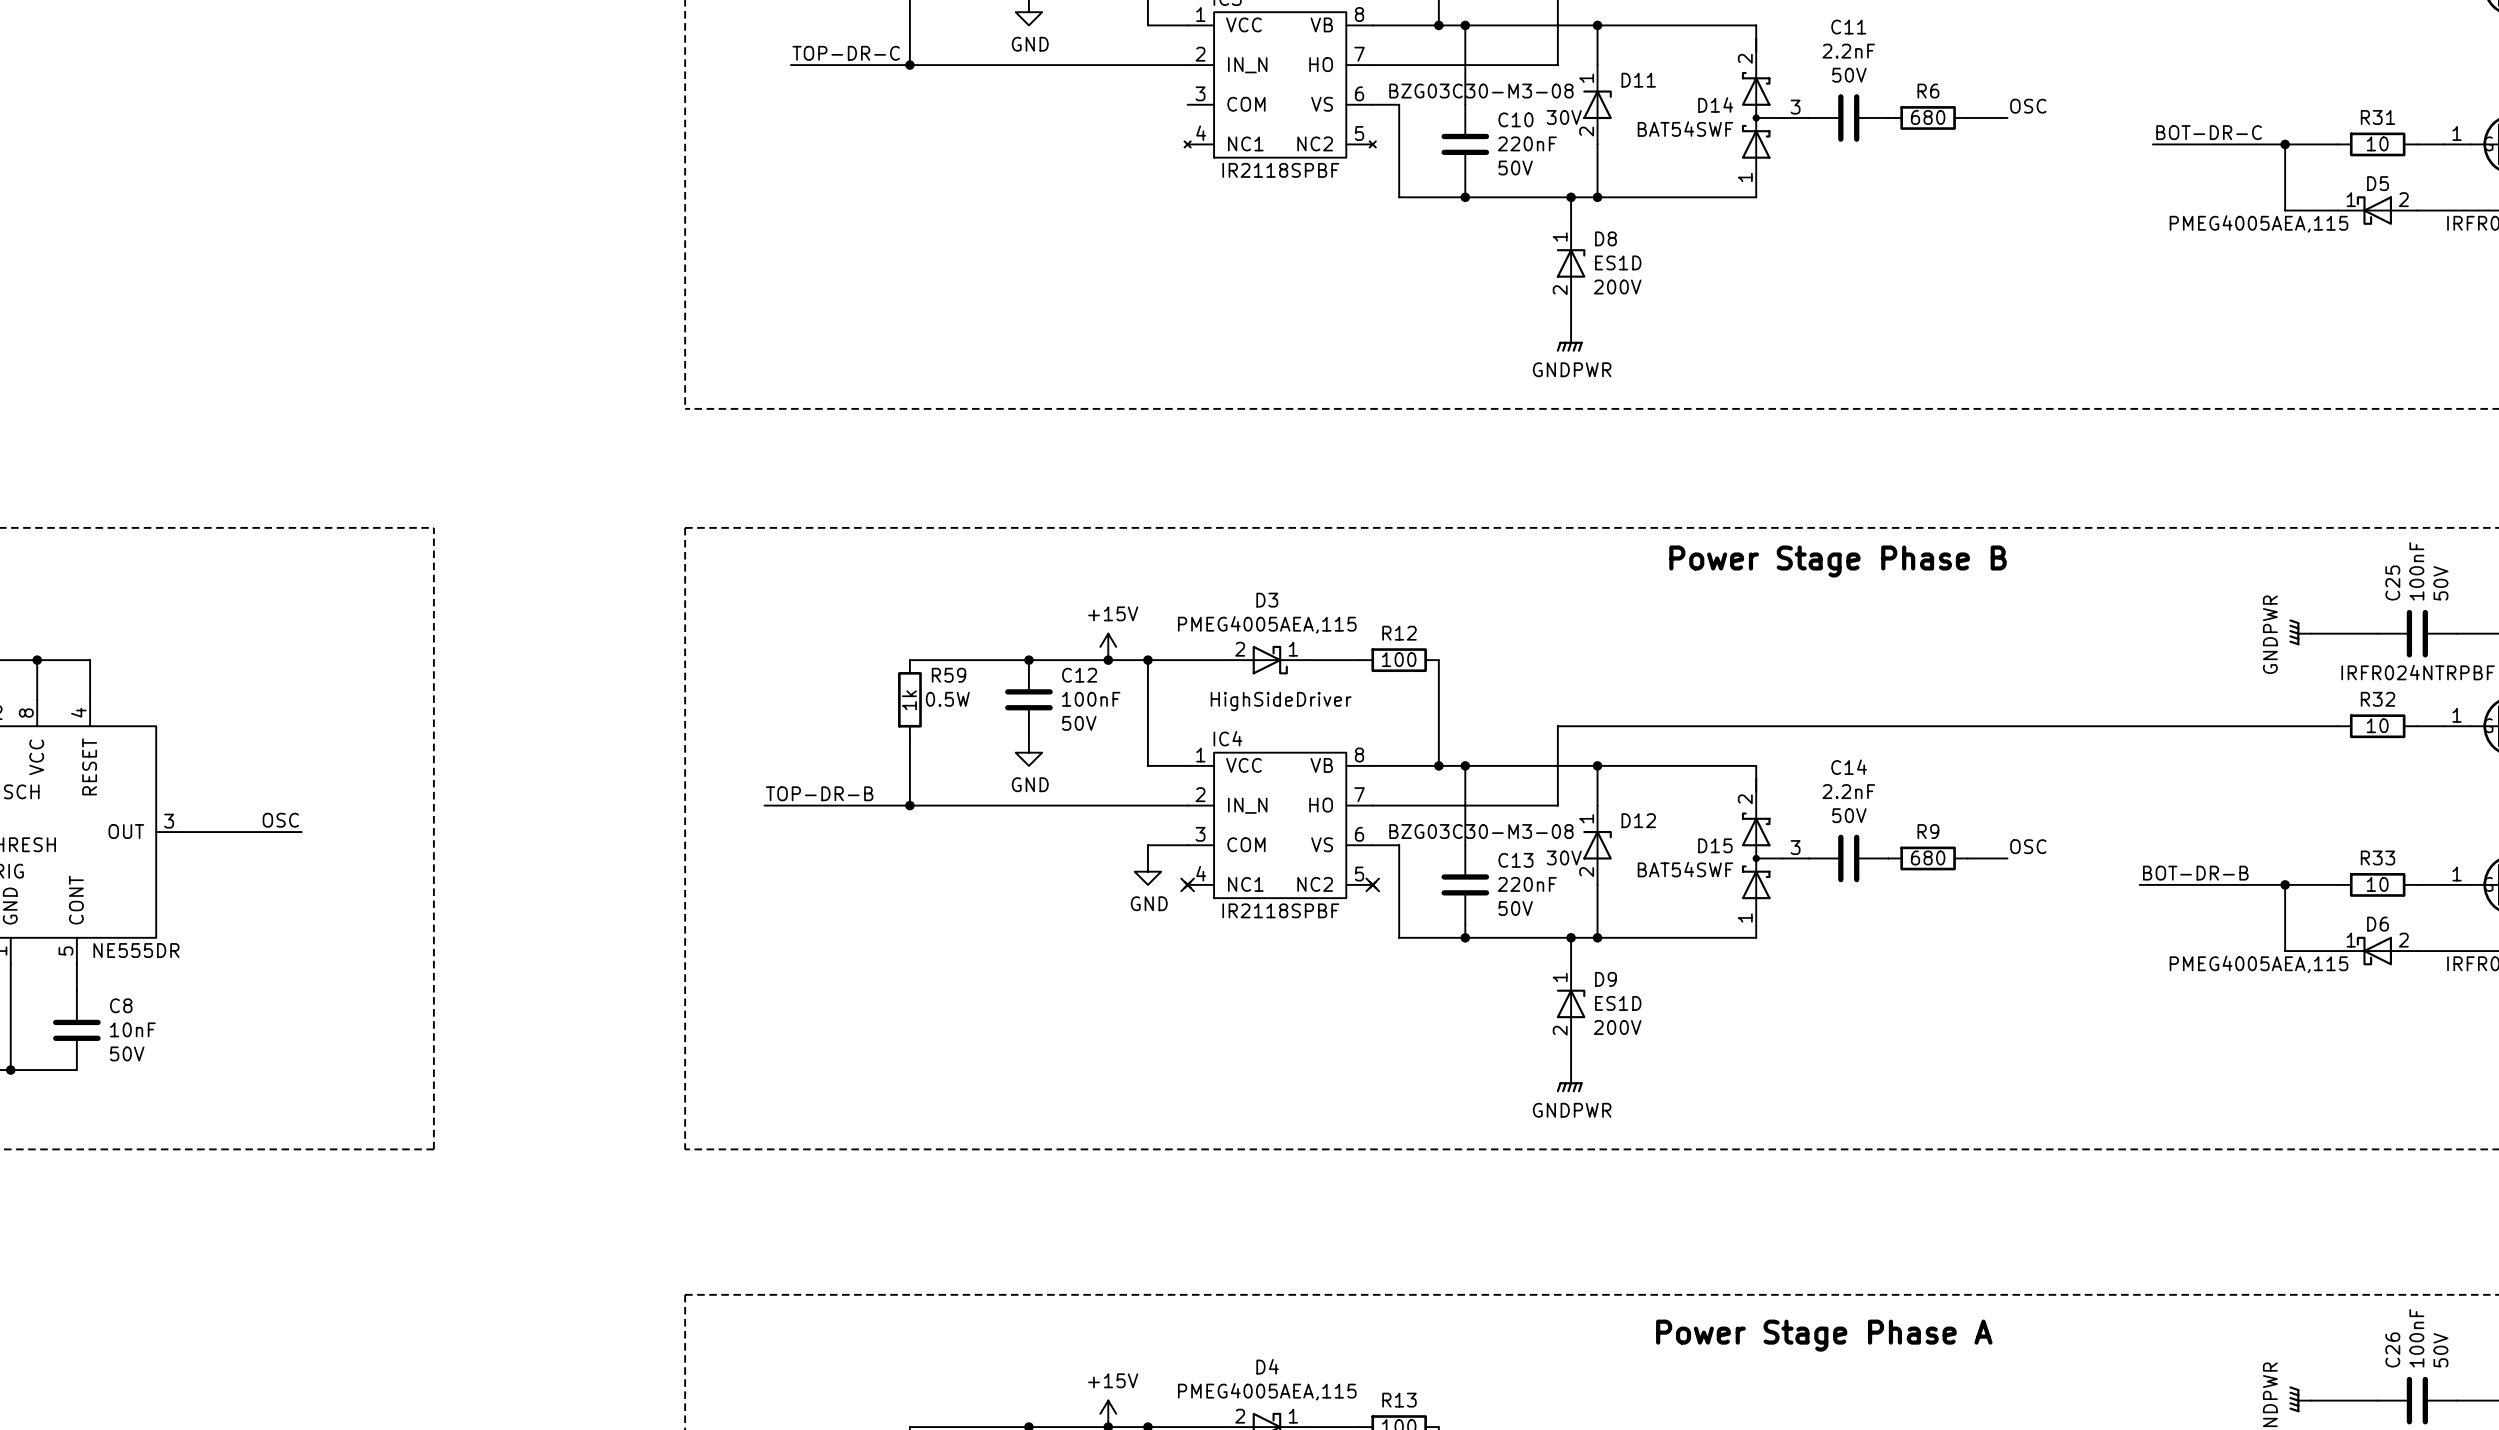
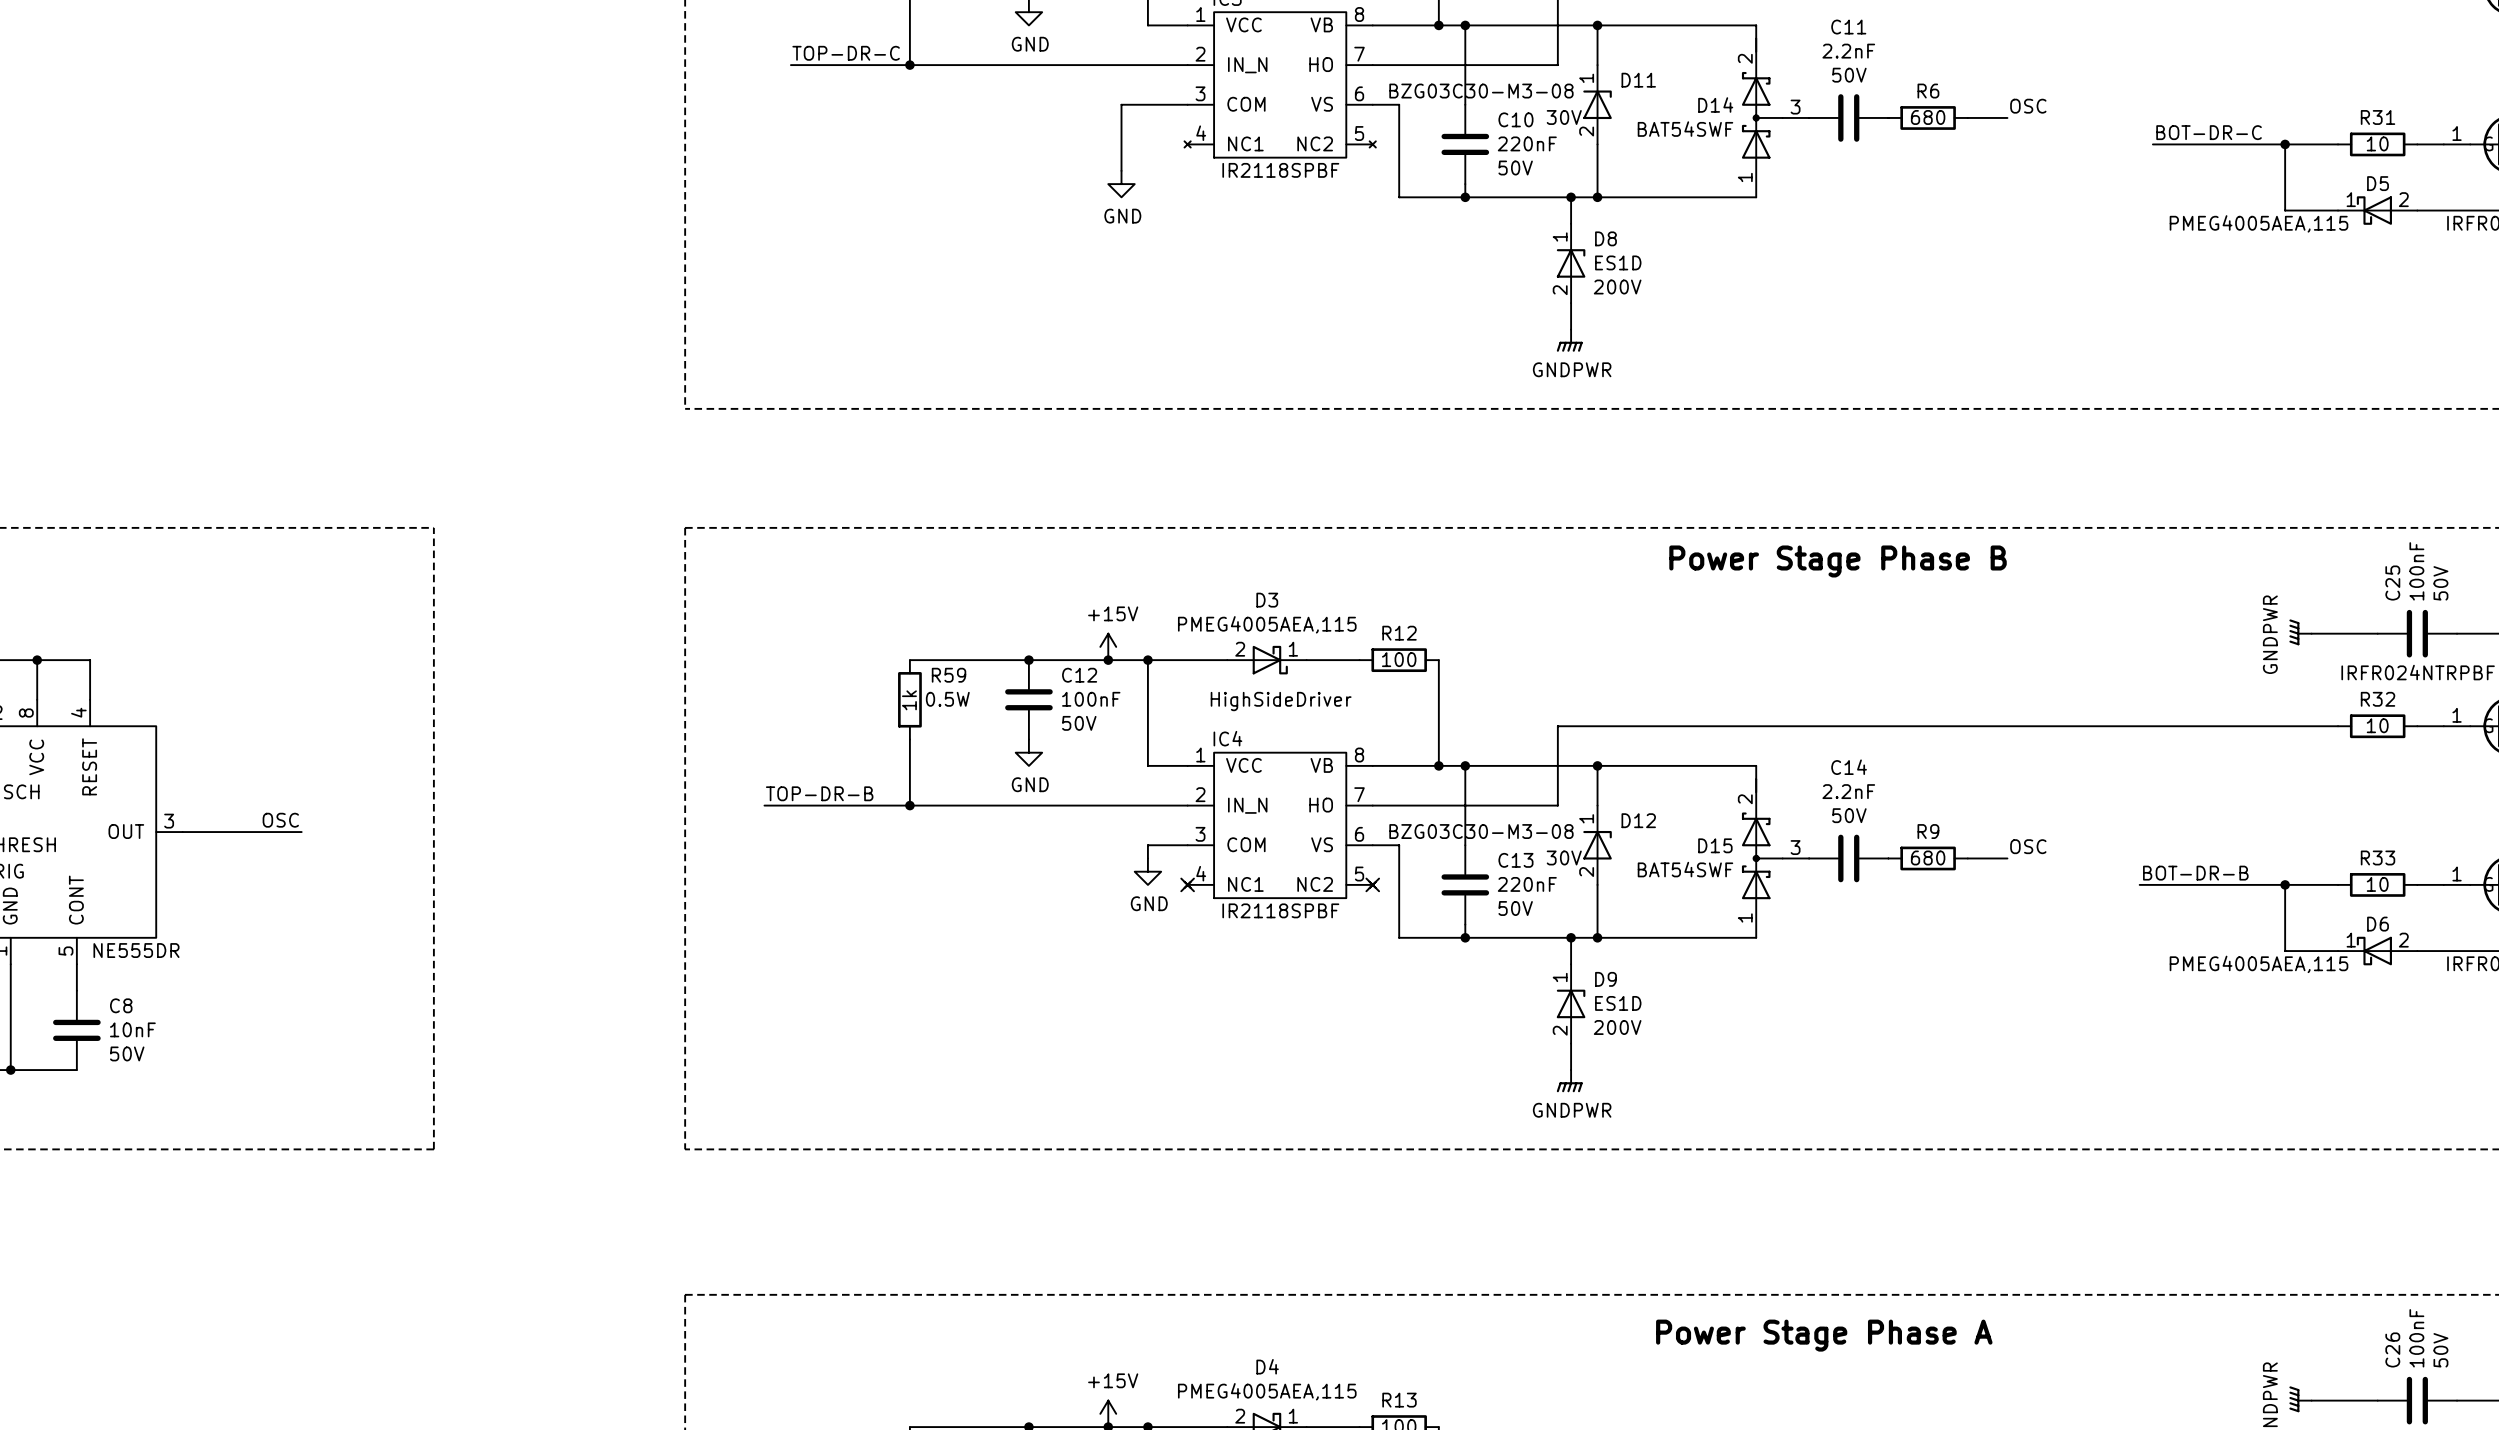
wire: none -> (1187, 104) (1121, 104) (1121, 170)
power symbol: none -> GND (1121, 184)

